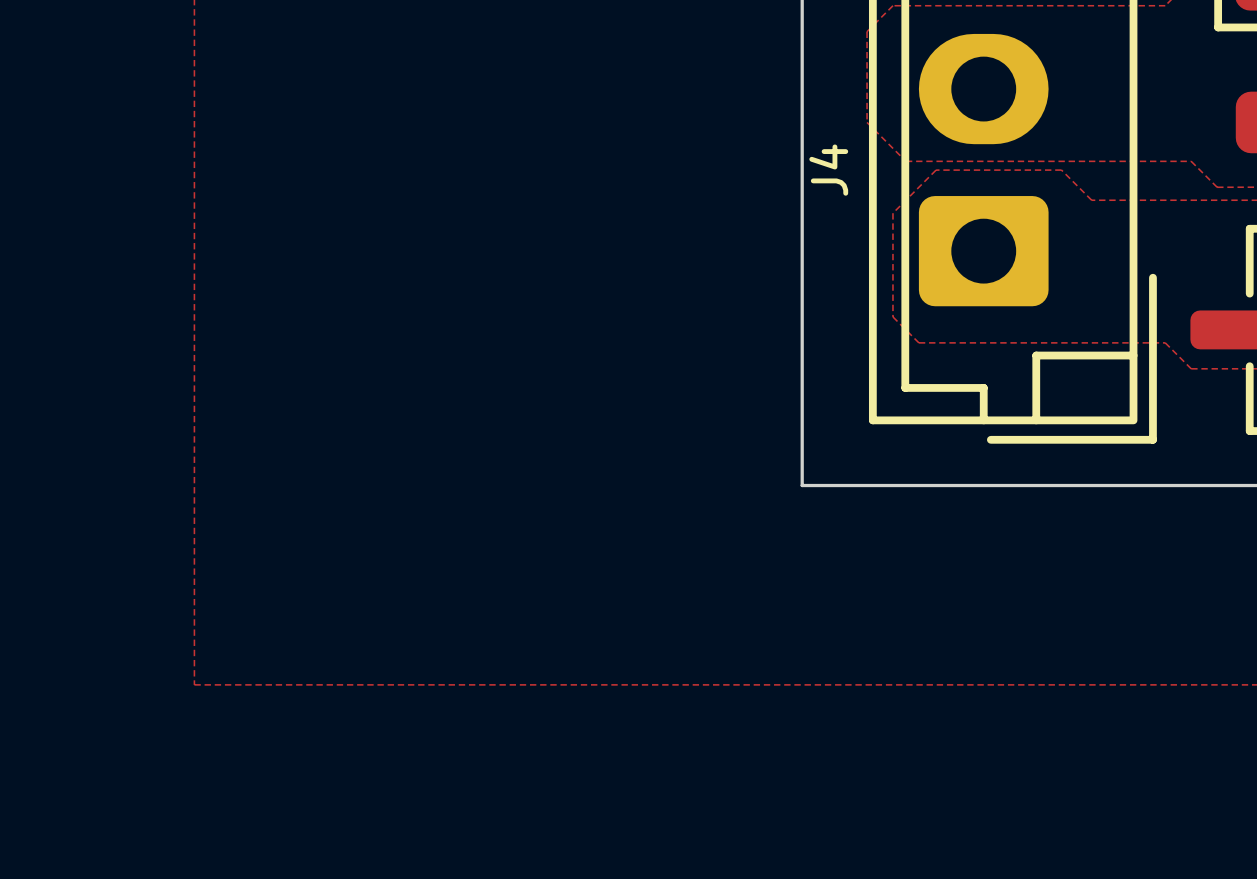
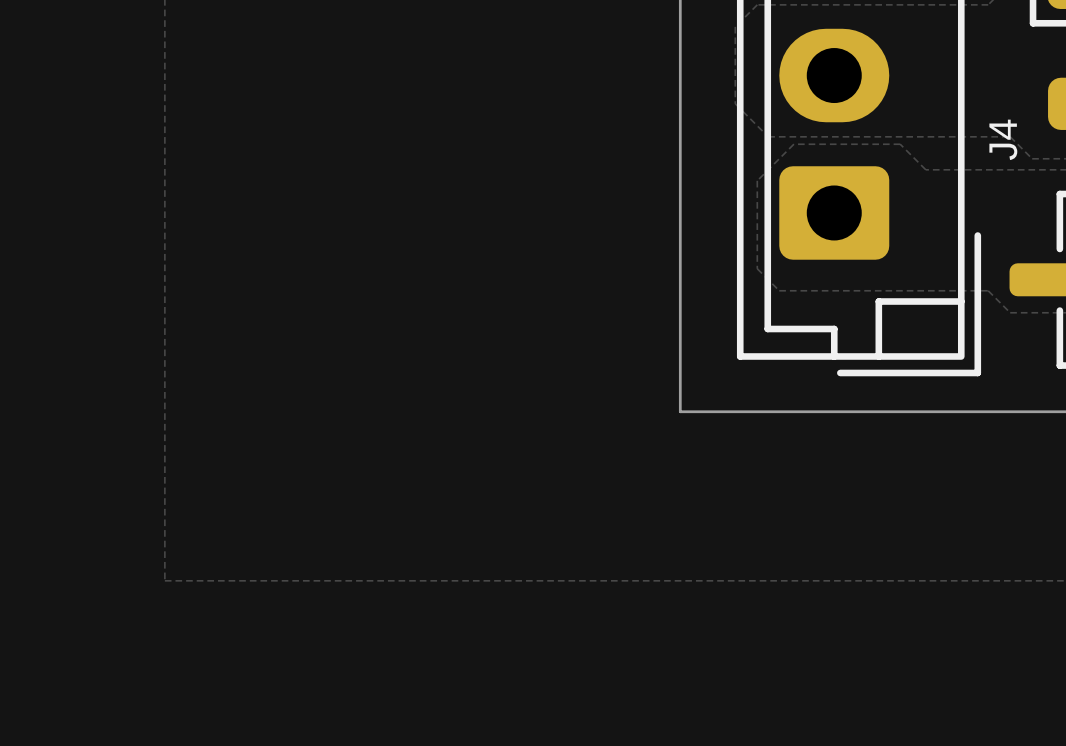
J4 name position: J4 (828, 170) -> J4 (1003, 139)

